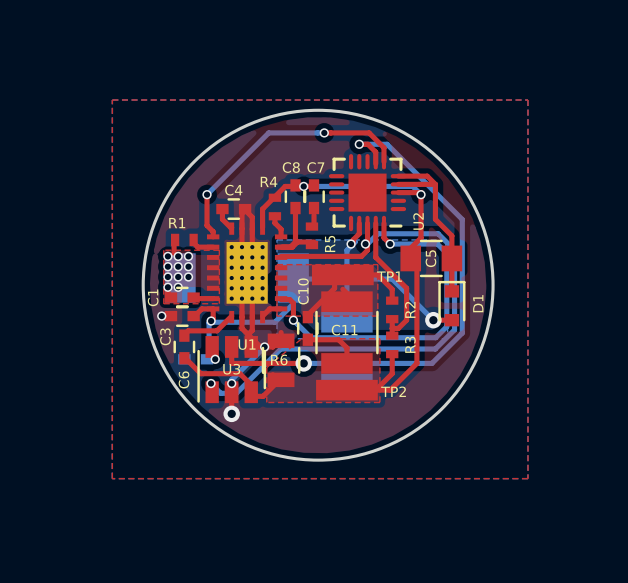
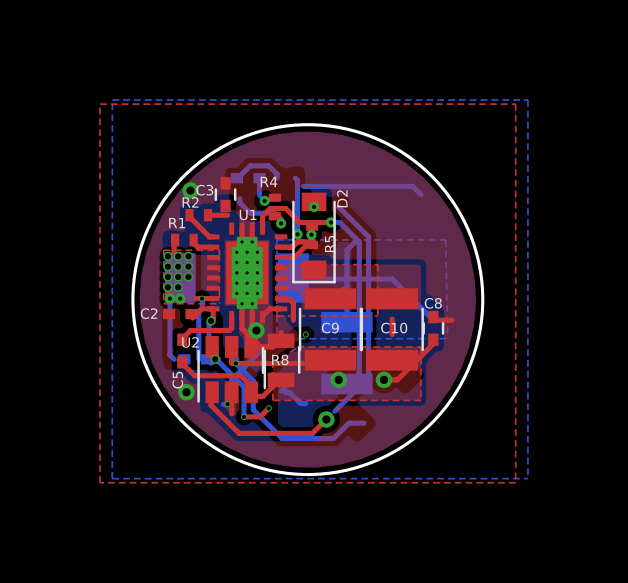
top zone outline: (112, 100) (528, 100) (528, 478) (112, 478) (112, 100) -> (100, 104) (515, 104) (515, 482) (100, 482) (100, 104)
top track: (324, 132) (369, 132) (383, 147) (383, 161) -> none
bottom track: (324, 132) (268, 132) (207, 194) -> none
via: (324, 132) -> none
top track: (359, 144) (367, 144) (375, 152) (375, 163) -> none
bottom track: (359, 144) (387, 144) (462, 219) (462, 333) (431, 363) (303, 363) -> none
via: (359, 144) -> none
C8 name position: C8 (291, 167) -> C8 (433, 303)
top track: (398, 176) (427, 176) (435, 184) -> none
bottom track: none -> (236, 178) (250, 165) (268, 165) (276, 174) (276, 178)
bottom track: none -> (259, 178) (259, 195)
bottom track: none -> (295, 178) (297, 180) (297, 234)
top track: (398, 184) (435, 184) -> none
top track: (435, 184) (435, 219) (451, 235) (451, 289) -> none
via: (303, 186) -> none
top track: (314, 186) (285, 186) (262, 209) (262, 216) -> (331, 222) (299, 222) (285, 208) (270, 208) (262, 216)
via: none -> (190, 190)
U2: (367, 192) -> none
top track: (398, 192) (421, 192) (421, 237) (410, 248) (410, 258) (416, 264) (416, 363) (390, 390) (342, 390) -> none
top track: (207, 194) (207, 225) (213, 231) (213, 236) -> (190, 215) (190, 217) (209, 236) (213, 236)
via: (207, 194) -> none
via: (421, 194) -> none
C8 position: (295, 196) -> (433, 328)
C7 side: top (314, 196) -> bottom (248, 178)
bottom track: none -> (239, 198) (239, 202) (250, 213) (274, 213) (281, 219) (281, 223)
via: none -> (264, 200)
via: none -> (314, 207)
bottom track: none -> (338, 207) (368, 236) (368, 377) (334, 411)
top track: (222, 209) (222, 219) (231, 227) -> none
C4: (233, 209) -> none
top track: (245, 209) (252, 217) (252, 228) -> none
top track: (246, 209) (241, 213) (241, 228) -> none
top track: (295, 213) (295, 241) (290, 247) -> none
top track: none -> (208, 215) (227, 215)
top track: (274, 215) (274, 223) (281, 229) (281, 236) -> none
top track: (314, 215) (314, 223) -> none
U1 footprint: [207, 222, 288, 324] -> [207, 222, 288, 324]
bottom track: none -> (331, 222) (339, 222) (359, 241) (359, 373) (353, 379) (338, 379)
via: none -> (331, 222)
via: none -> (281, 223)
top track: (359, 223) (359, 233) (353, 239) (353, 244) -> none
top track: (367, 223) (367, 250) (361, 256) (281, 256) -> none
top track: (375, 223) (375, 257) (406, 288) (406, 320) (398, 328) (392, 328) -> none
top track: (383, 223) (383, 237) (390, 244) -> none
via: none -> (297, 234)
top track: none -> (311, 234) (311, 240) (294, 257) (283, 257)
via: none -> (311, 234)
D2: none -> (314, 237)
C5 footprint: [400, 239, 463, 278] -> [177, 333, 188, 369]
via: (351, 244) -> none
via: (365, 244) -> none
bottom track: (367, 244) (377, 233) (438, 233) (454, 250) (454, 329) (435, 349) (280, 349) (236, 393) (220, 393) (211, 383) -> none
bottom track: (390, 244) (437, 244) (446, 253) (446, 326) (435, 337) (310, 337) (293, 320) -> none
via: (390, 244) -> none
top track: (342, 274) (377, 274) (392, 289) (392, 300) -> none
TP1: (342, 274) -> none
bottom track: (293, 279) (293, 303) (274, 322) (209, 322) -> none
top track: (334, 281) (334, 288) (307, 314) -> none
round board edge position: (318, 285) -> (307, 299)
bottom track: none -> (169, 288) (169, 355) (174, 359)
C1: (182, 297) -> none
via: none -> (169, 298)
via: none -> (180, 298)
bottom track: none -> (202, 298) (202, 308) (198, 311) (198, 359)
via: none -> (202, 298)
D1: (451, 303) -> none
R2 rotation: 0° (392, 309) -> 90° clockwise (198, 215)
R2 position: (392, 309) -> (198, 215)
C10 footprint: [296, 310, 319, 346] -> [360, 288, 424, 371]
C2: none -> (180, 314)
via: (161, 316) -> none
C3 rotation: 0° (182, 316) -> 90° clockwise (225, 194)
C3 position: (182, 316) -> (225, 194)
top track: (231, 316) (216, 330) (188, 330) (184, 335) -> none
top track: none -> (231, 317) (231, 328) (229, 330) (190, 330) (182, 338)
via: (293, 320) -> none
via: (433, 320) -> none
via: none -> (256, 330)
C11 name: C11 (344, 330) -> C9 (330, 328)
C11 position: (346, 332) -> (330, 329)
via: none -> (305, 334)
top zone outline: (301, 338) (266, 367) (266, 402) (379, 402) (379, 338) (301, 338) -> (297, 346) (272, 365) (272, 400) (421, 400) (421, 346) (297, 346)
top track: (307, 339) (338, 339) (346, 347) (346, 363) -> none
top track: none -> (433, 342) (397, 379) (383, 379)
U1 name position: U1 (247, 344) -> U1 (248, 214)
R3: (392, 344) -> none
C6: (184, 346) -> none
via: (264, 346) -> none
top track: (392, 354) (392, 373) (375, 390) -> none
top track: (184, 357) (200, 373) (239, 373) (250, 383) (250, 396) -> none
bottom track: none -> (236, 359) (235, 363) (253, 380) (253, 409) (282, 438) (333, 438) (348, 423) (364, 423)
R6 name: R6 (279, 359) -> R8 (280, 359)
top track: none -> (179, 360) (194, 375) (240, 375) (252, 387) (252, 396)
bottom track: none -> (211, 363) (215, 359) (218, 359) (244, 387) (244, 416)
via: none -> (235, 363)
via: (303, 363) -> none
U3 name: U3 (231, 369) -> U2 (190, 342)
via: none -> (338, 379)
via: none -> (383, 379)
via: (211, 383) -> none
via: (231, 383) -> none
TP2: (346, 390) -> none
bottom track: none -> (281, 391) (284, 387) (286, 392) (289, 392) (300, 403) (305, 403)
via: none -> (186, 392)
top track: none -> (211, 396) (211, 405) (239, 433) (312, 433) (326, 419)
bottom track: none -> (227, 404) (223, 404)
via size: [223, 405, 240, 423] -> [224, 401, 231, 408]
top track: none -> (268, 408) (260, 416) (244, 416)
via: none -> (268, 408)
via: none -> (244, 416)
via: none -> (326, 419)

